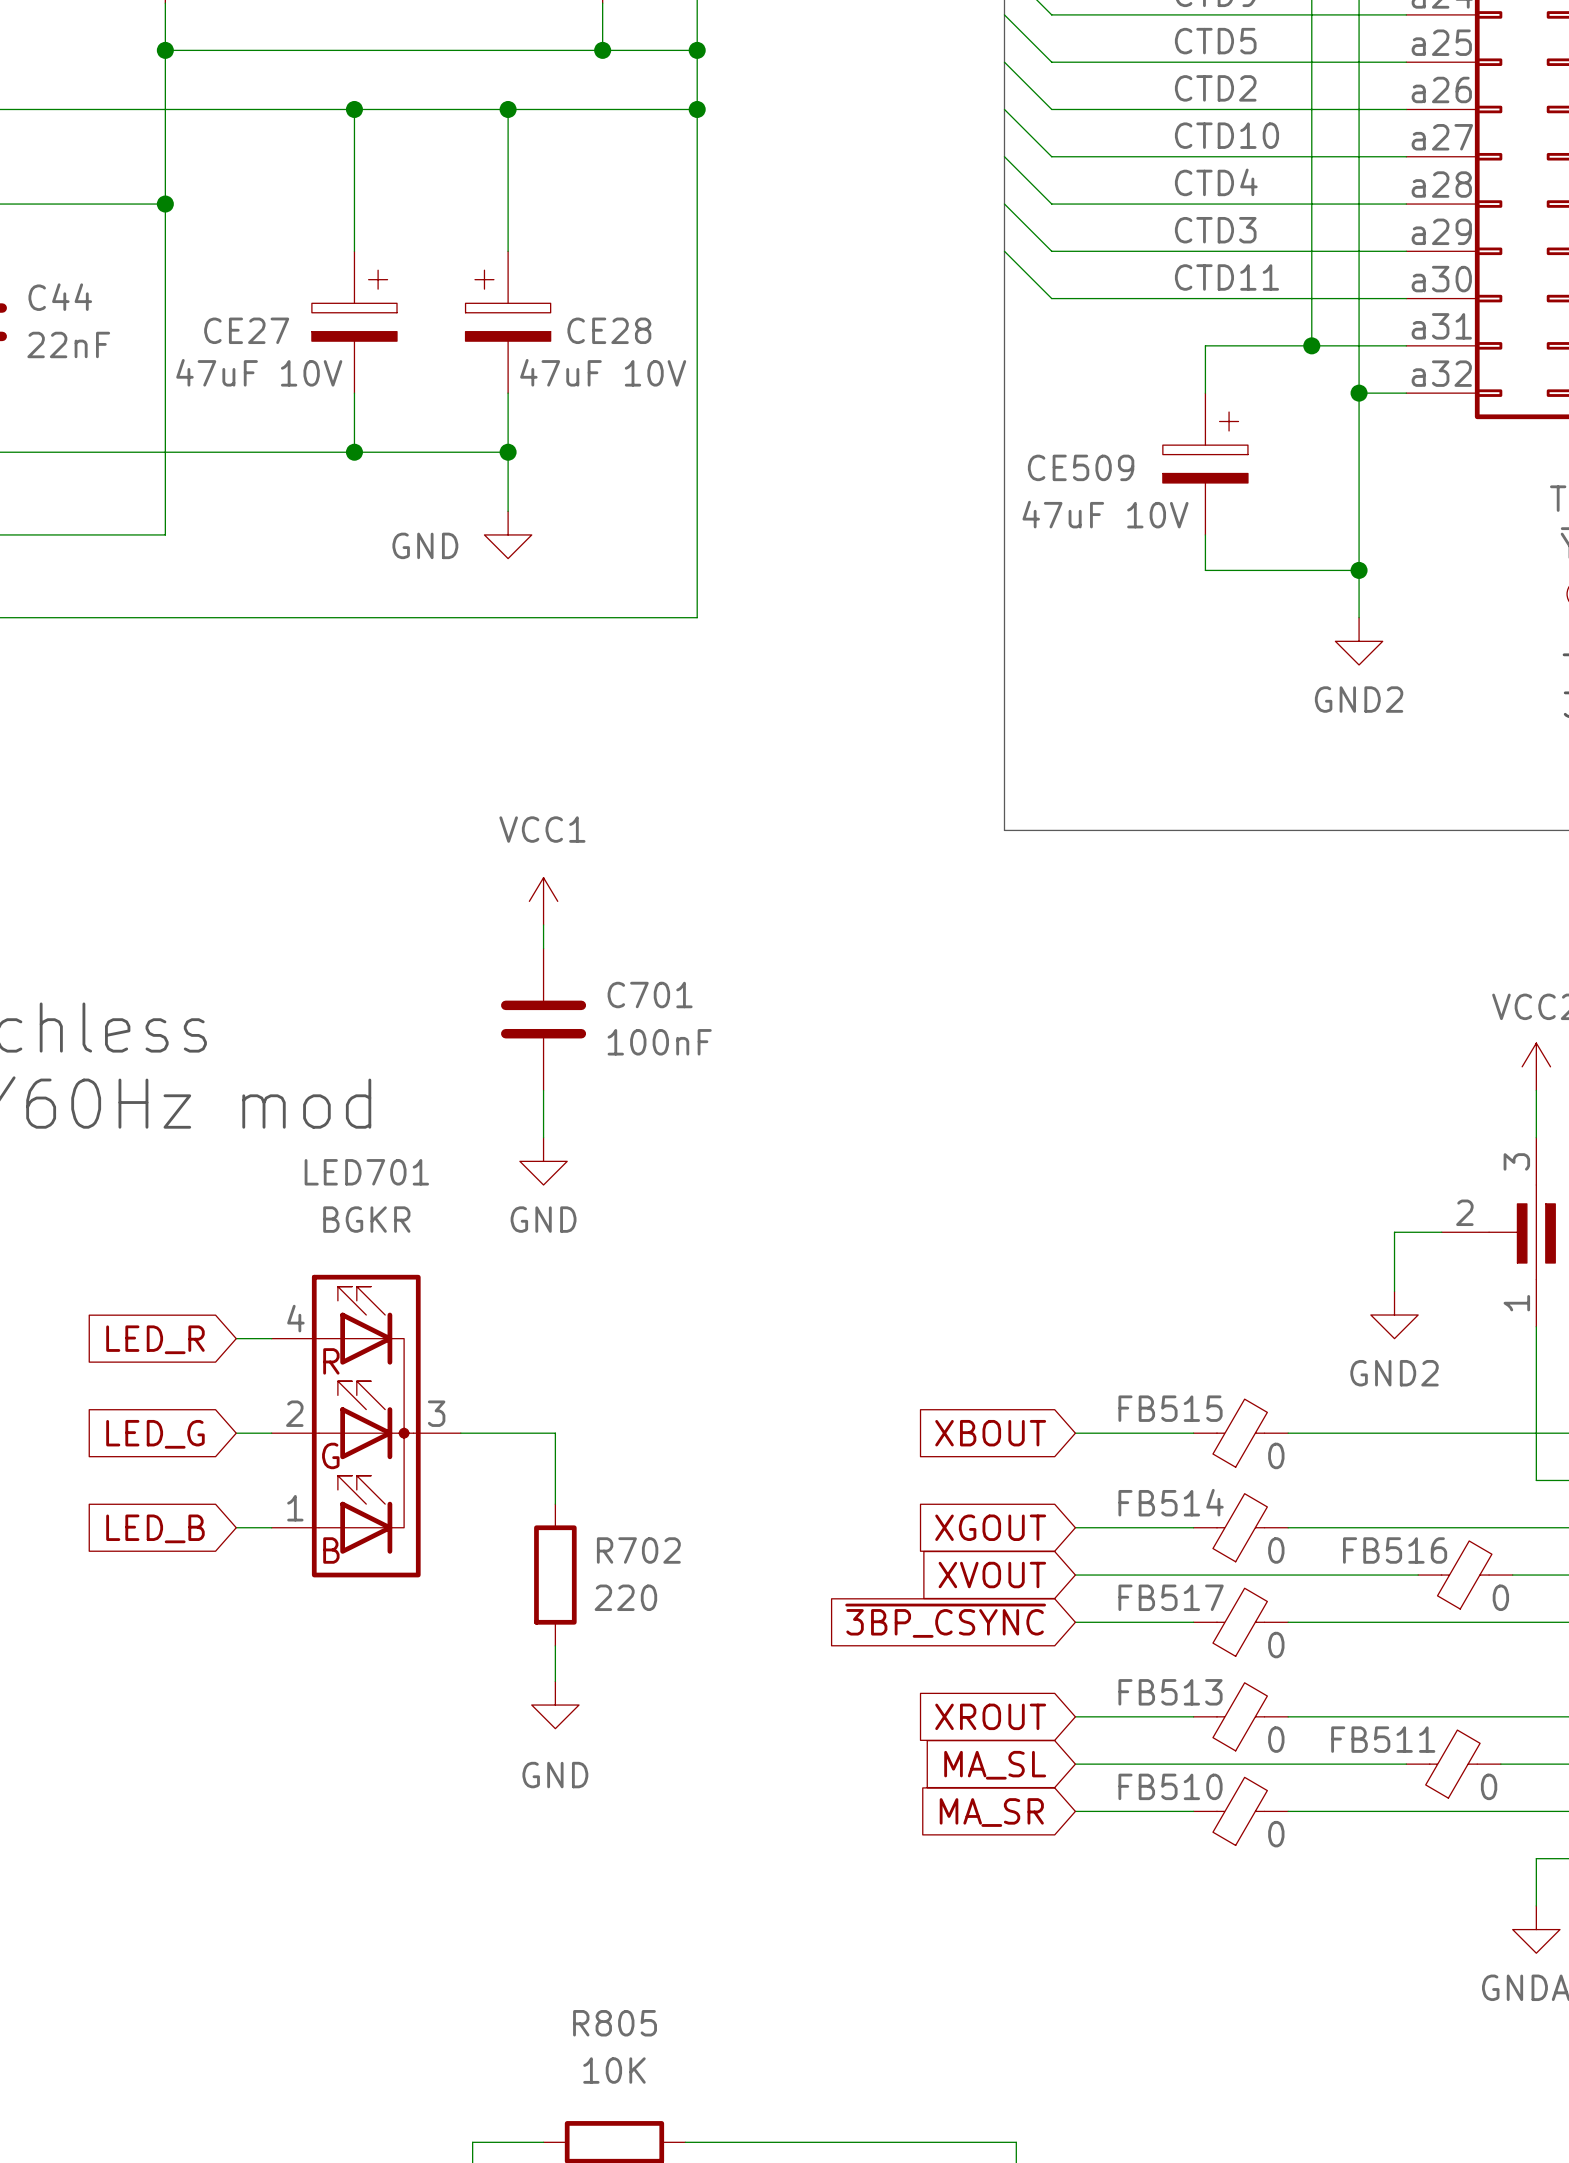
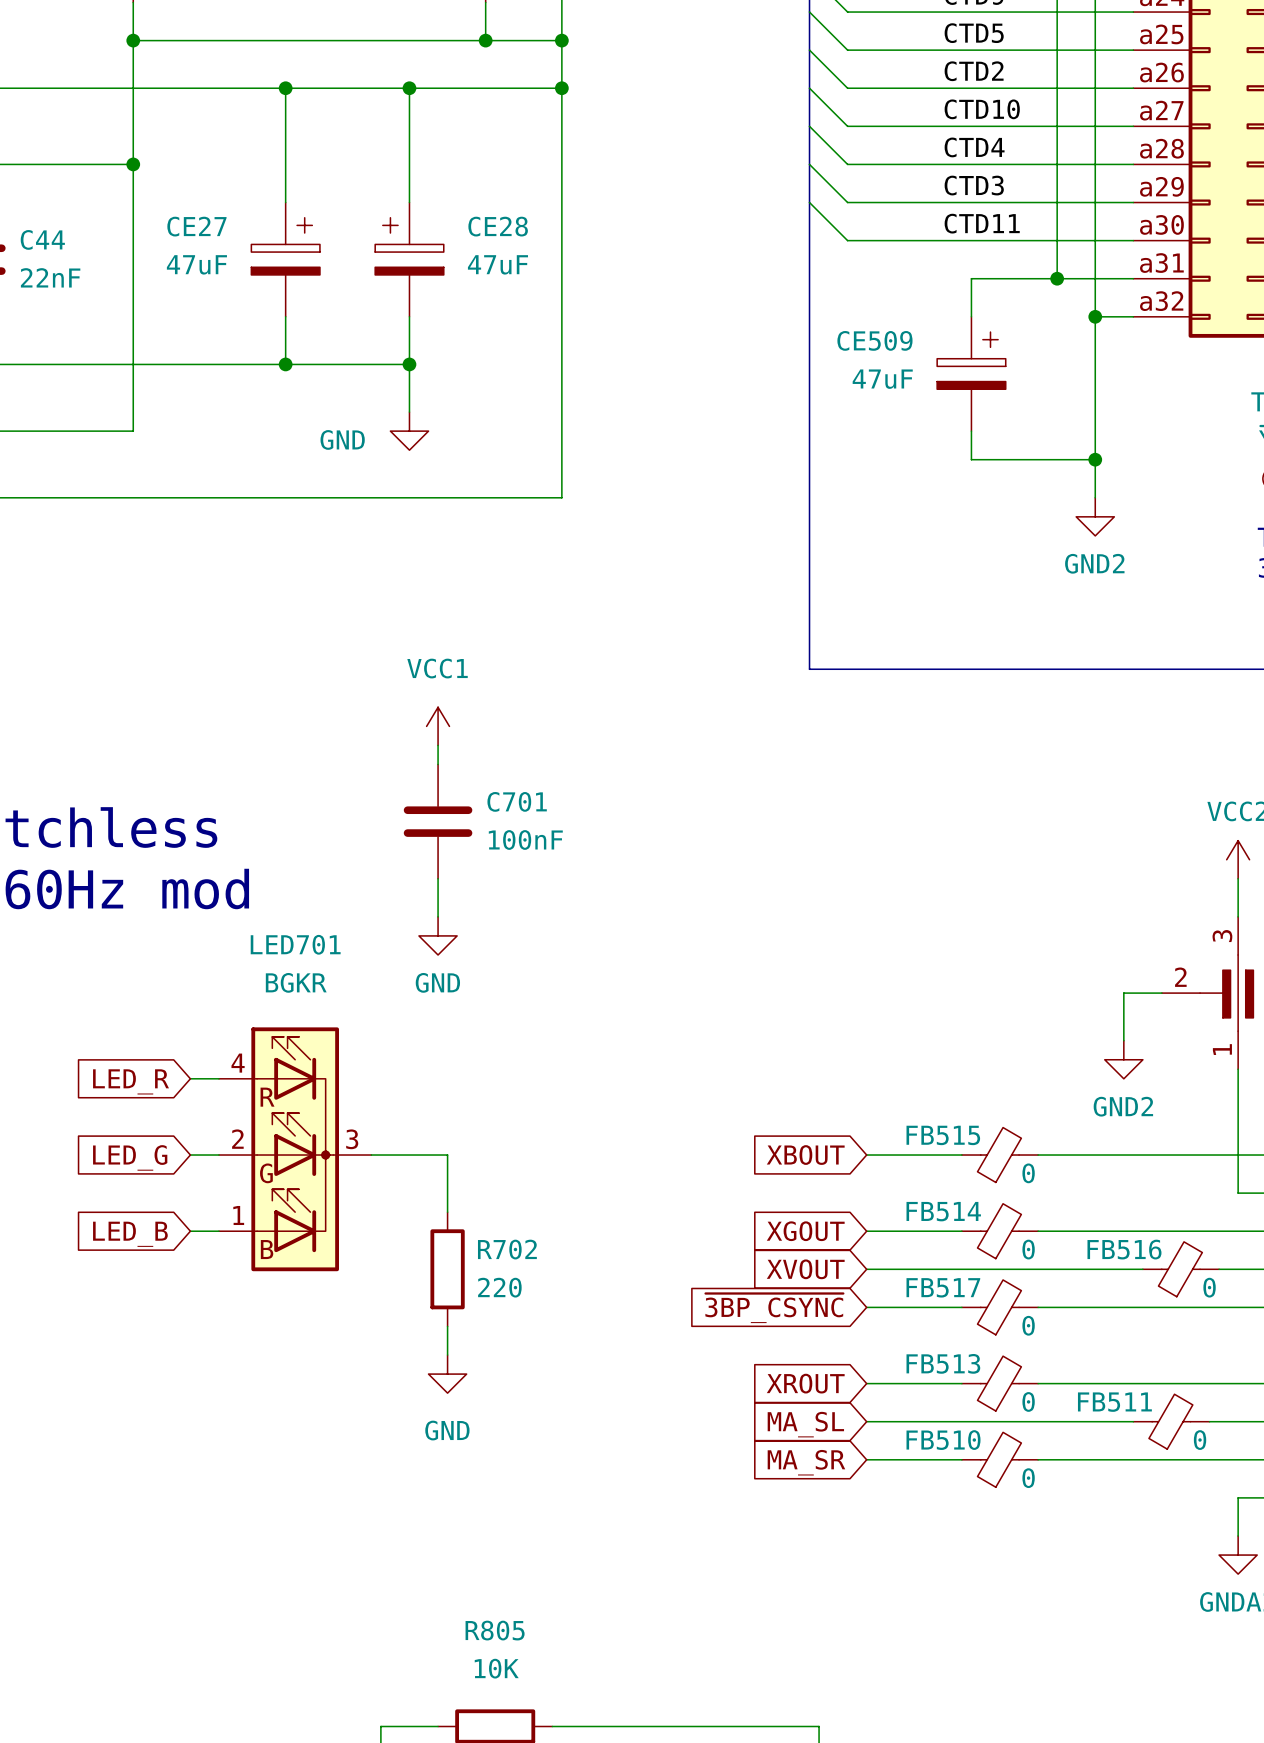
CE27 name position: CE27 (246, 330) -> CE27 (196, 226)
CE28 name position: CE28 (609, 330) -> CE28 (498, 226)
CE27 value: 47uF 10V (259, 372) -> 47uF (196, 264)
CE28 value: 47uF 10V (603, 372) -> 47uF (497, 264)
CE509 name position: CE509 (1081, 467) -> CE509 (874, 340)
CE509 value: 47uF 10V (1105, 514) -> 47uF (882, 379)

